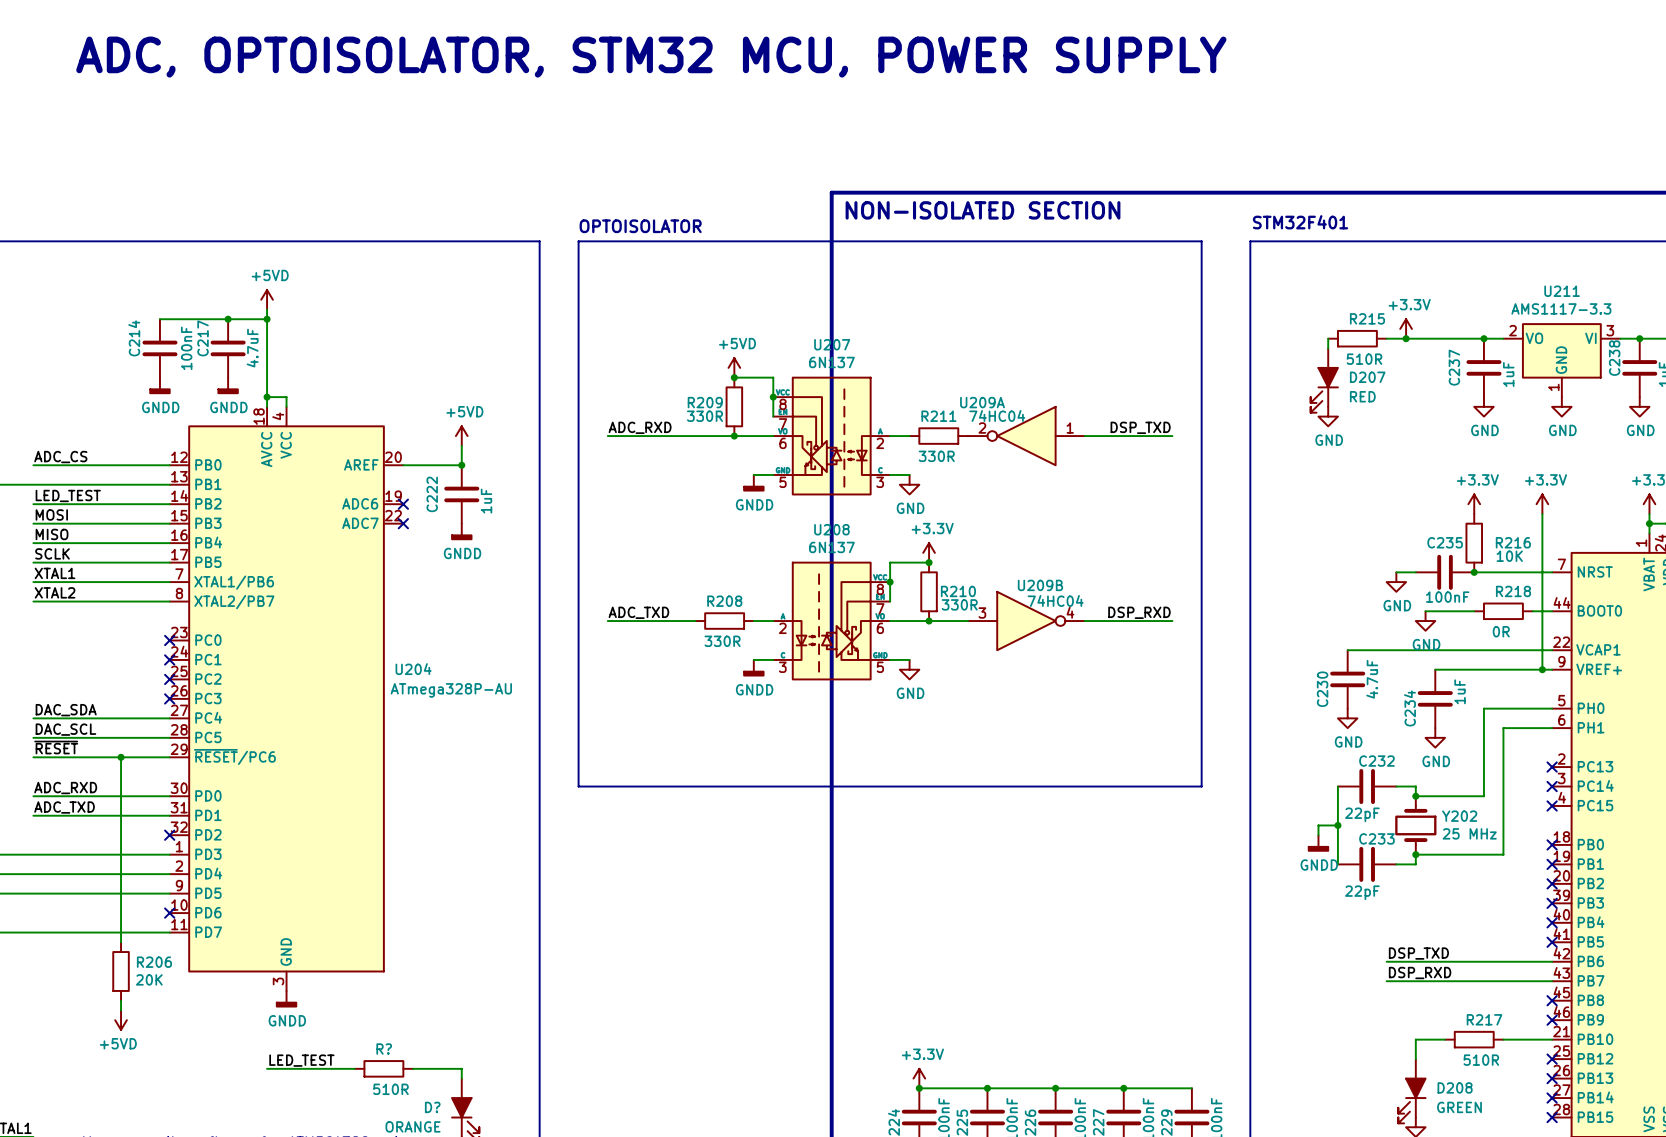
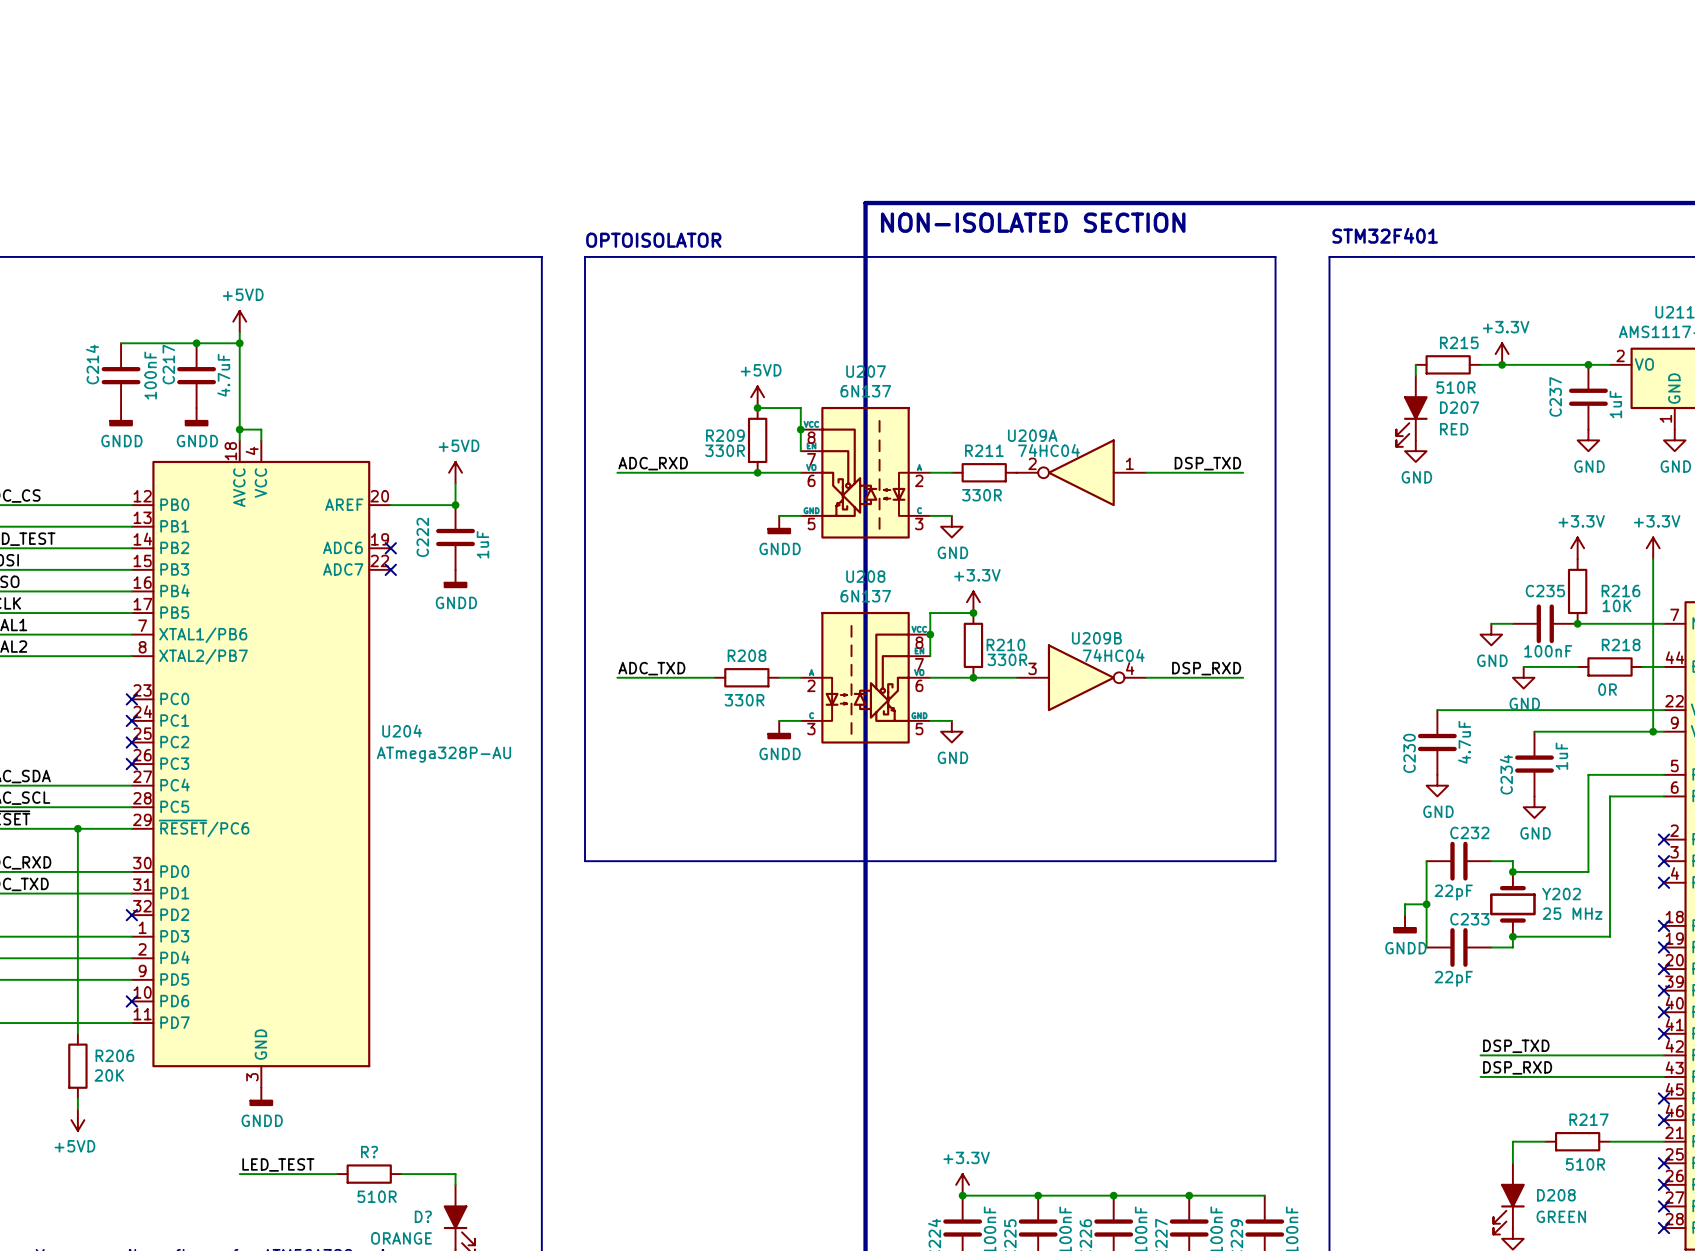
text: ADC, OPTOISOLATOR, STM32 MCU, POWER SUPPLY (651, 57) -> none

